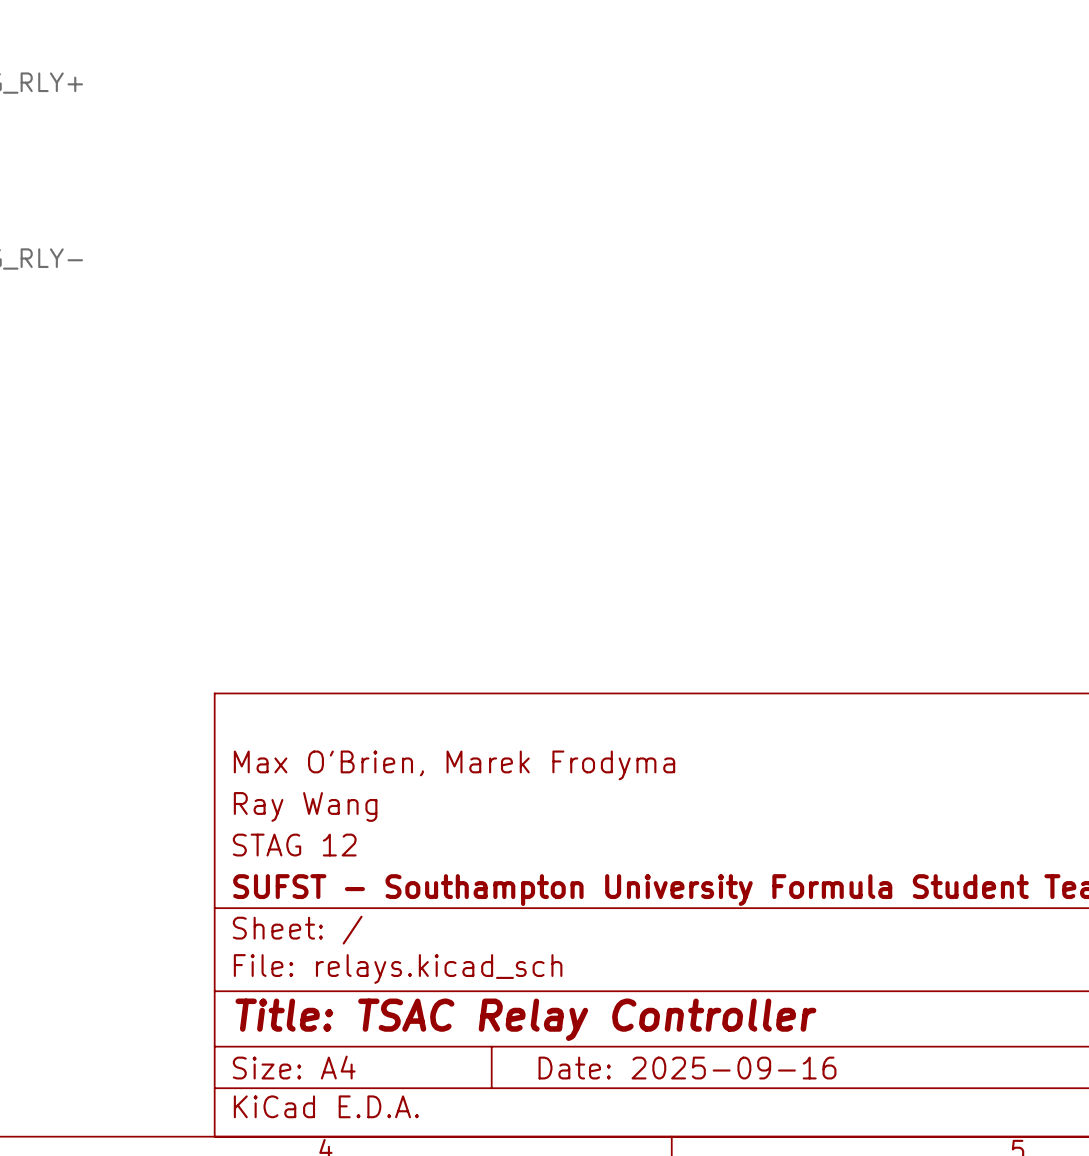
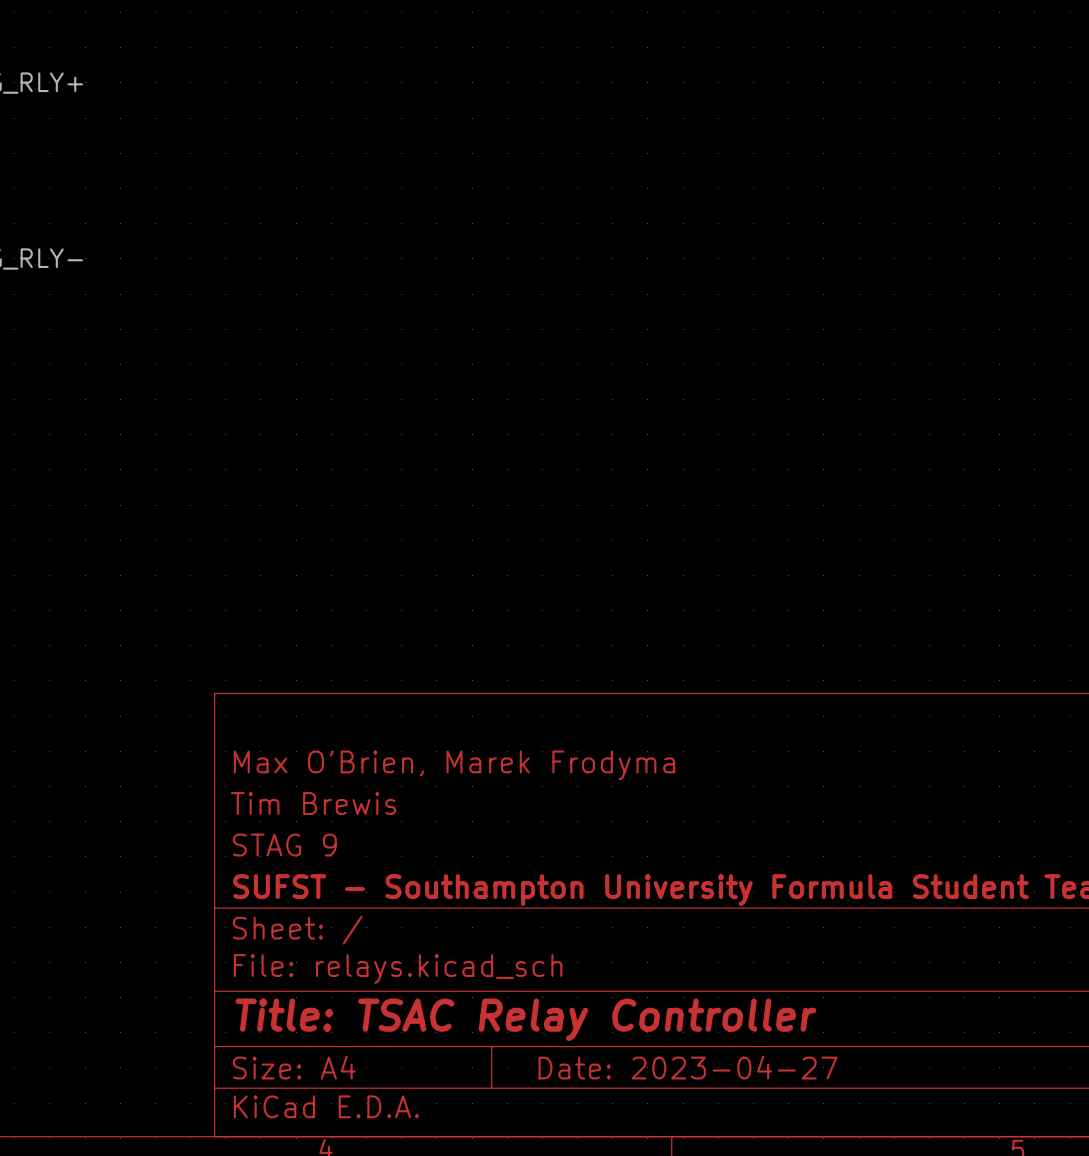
title block: Ray Wang (305, 806) -> Tim Brewis (313, 803)
title block: STAG 12 (294, 845) -> STAG 9 (284, 845)
title block: Date: 2025-09-16 (687, 1068) -> Date: 2023-04-27 (687, 1067)

